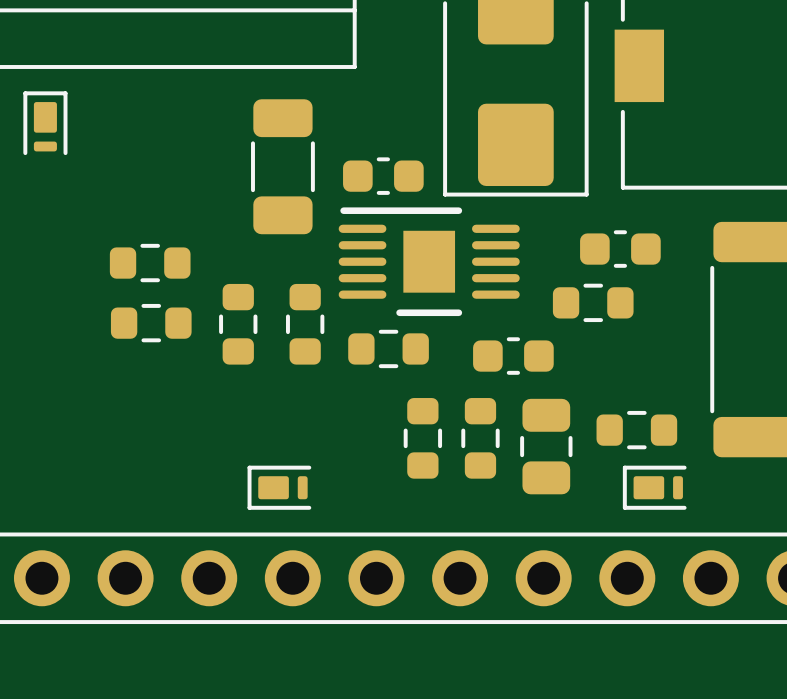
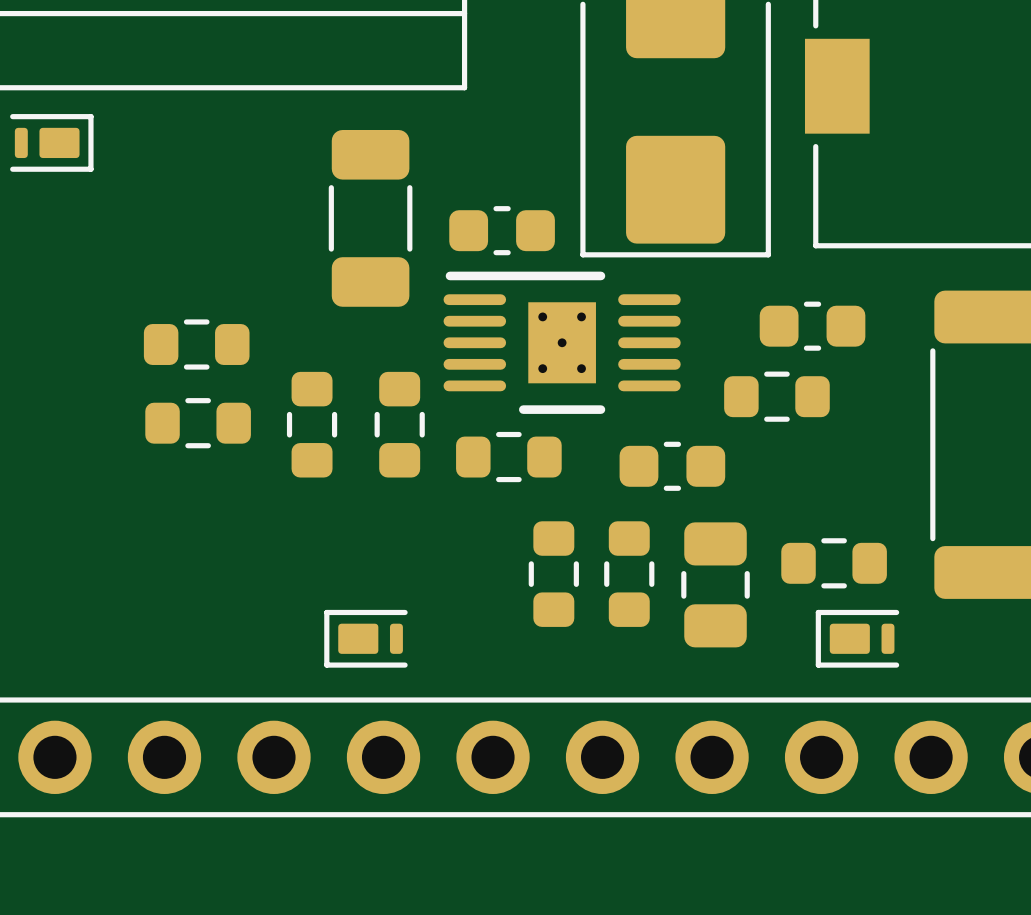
part rotation: 0° (45, 123) -> 90° clockwise (51, 142)
part footprint: [338, 207, 520, 317] -> [443, 271, 681, 414]

